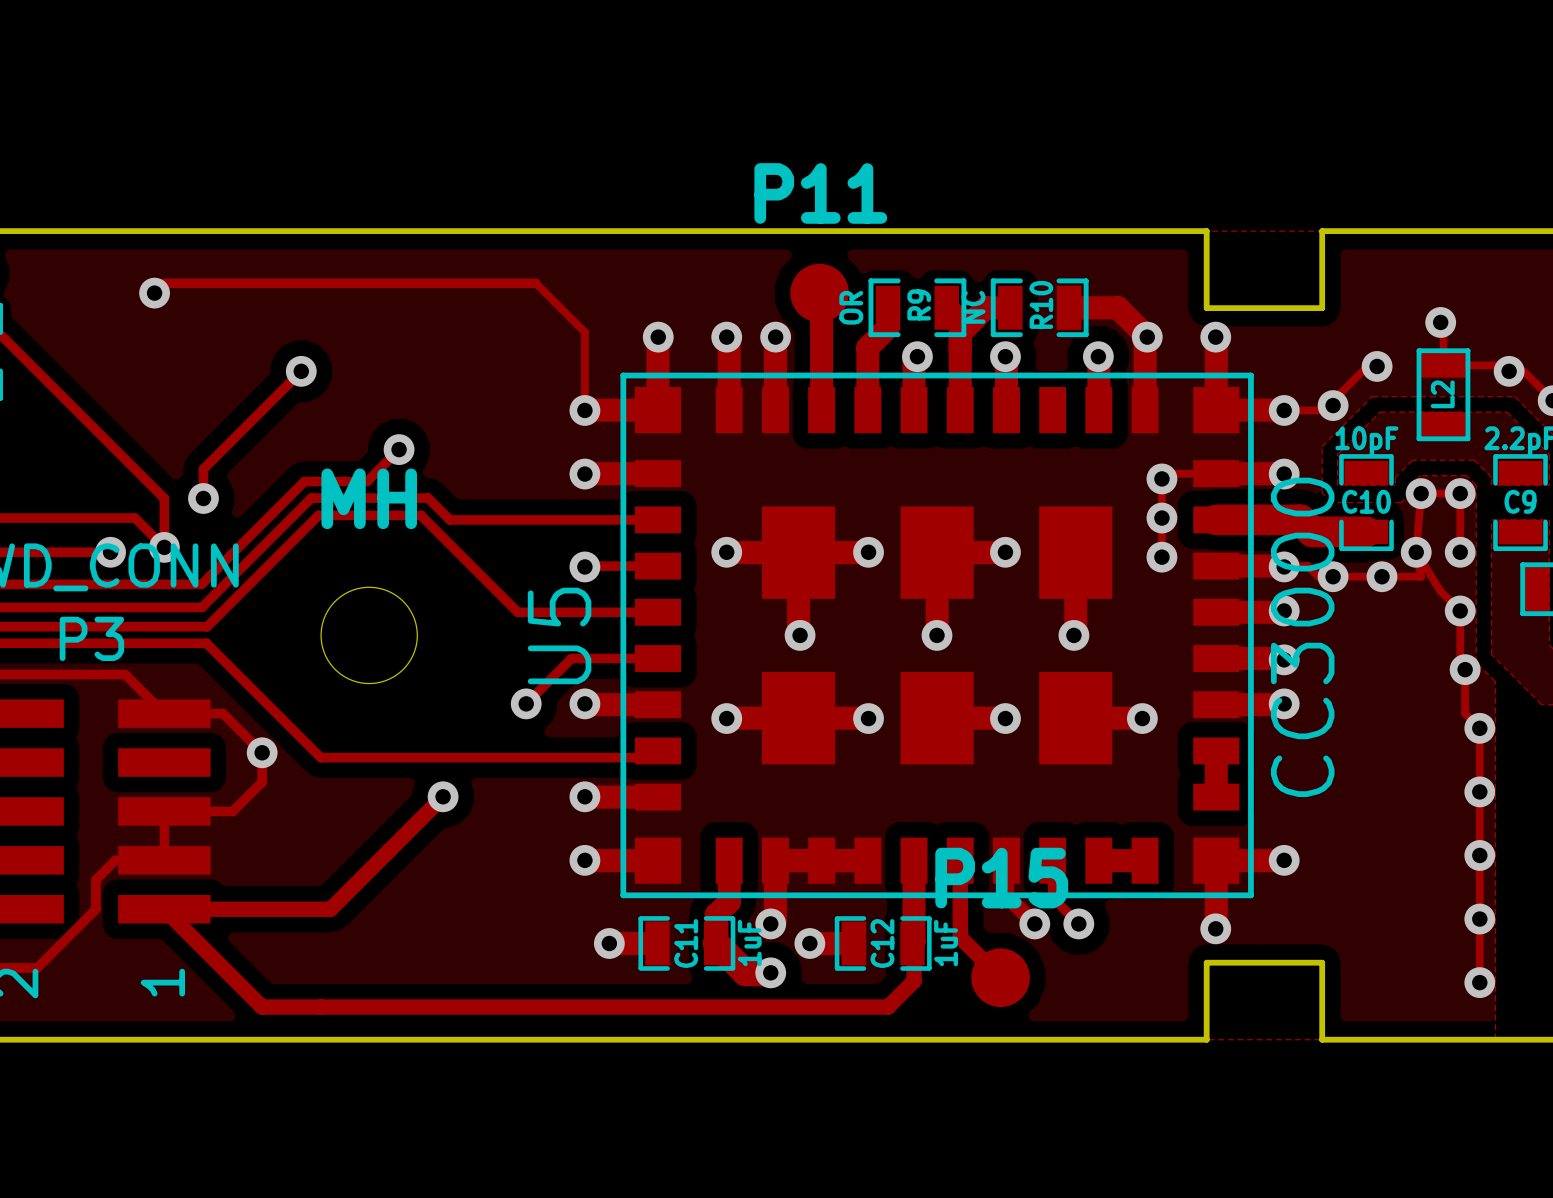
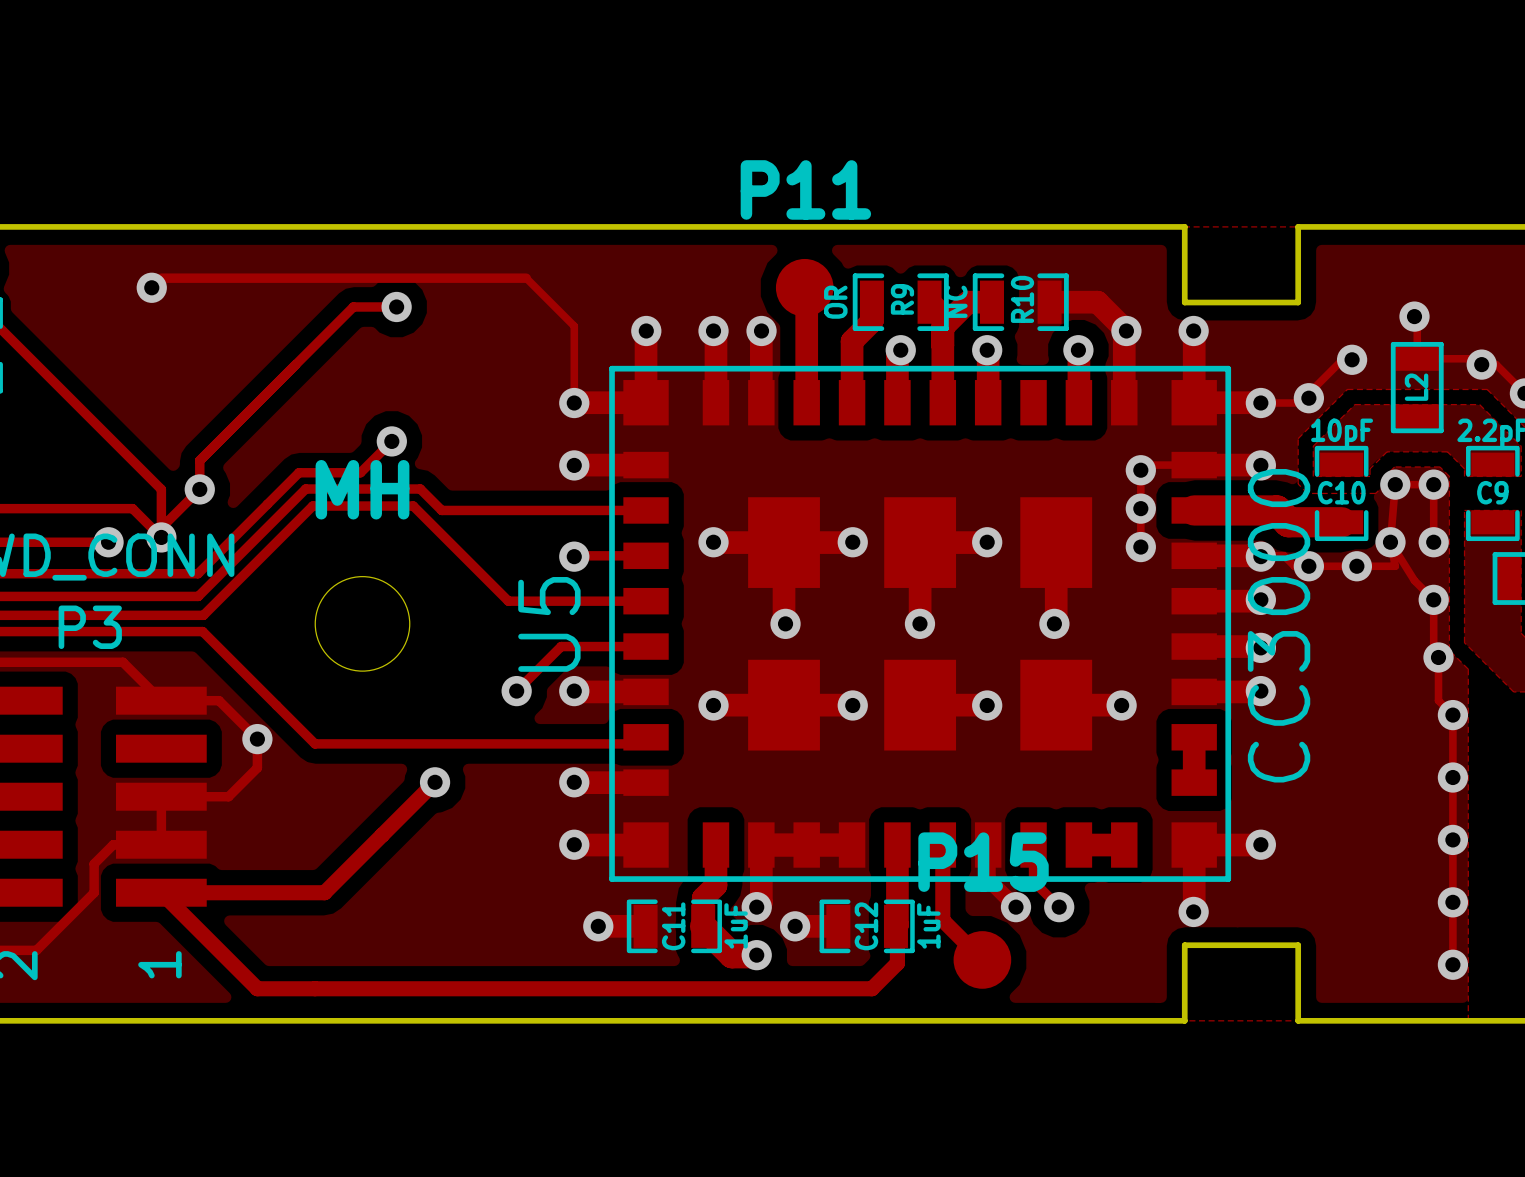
track: none -> (396, 306) (353, 306) (295, 364)
via position: (301, 371) -> (396, 306)
track: none -> (199, 489) (161, 527)

